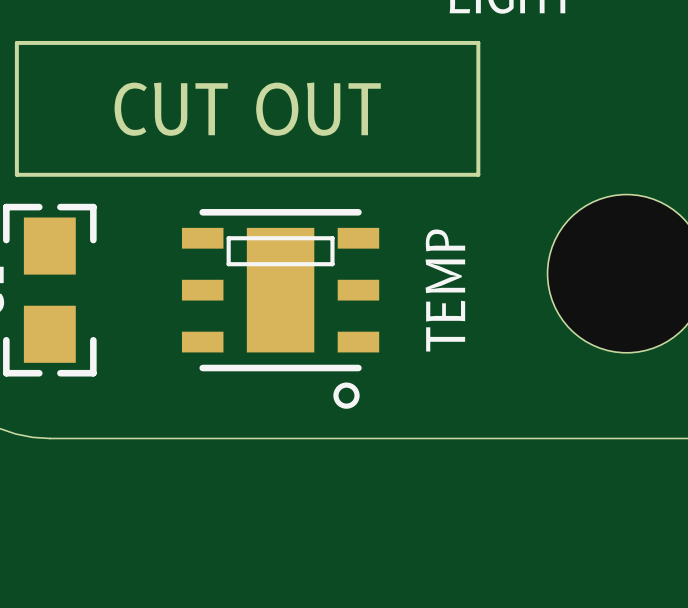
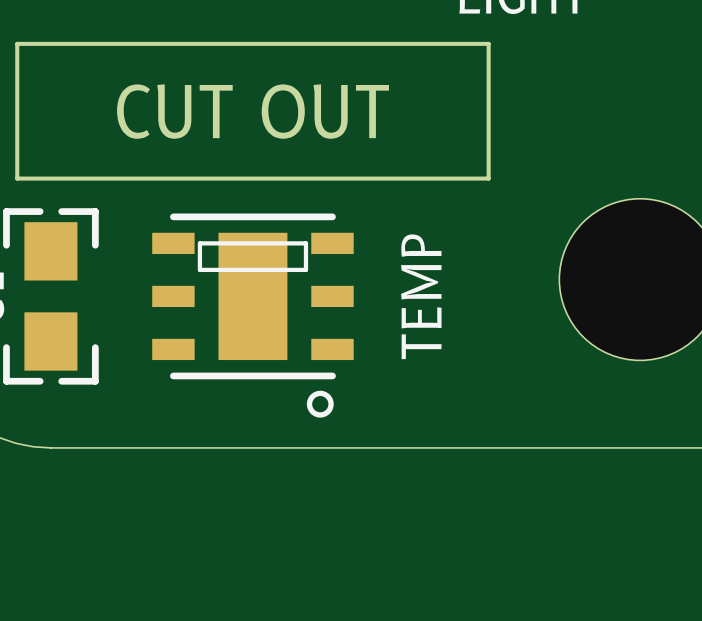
TEMP position: (280, 308) -> (252, 315)

